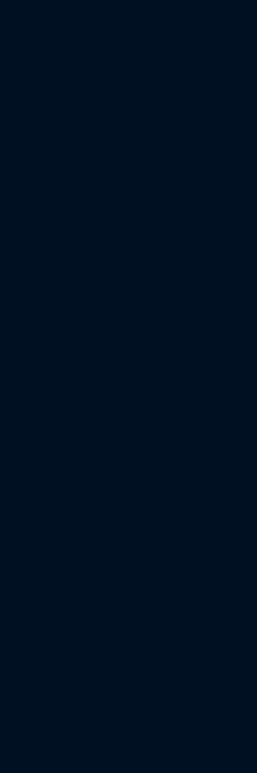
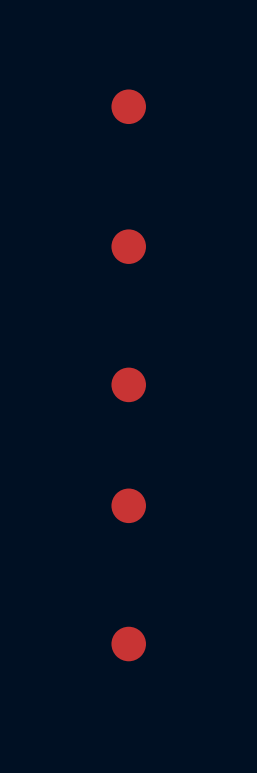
part: none -> (128, 106)
part: none -> (128, 246)
part: none -> (128, 384)
part: none -> (128, 505)
part: none -> (128, 644)

